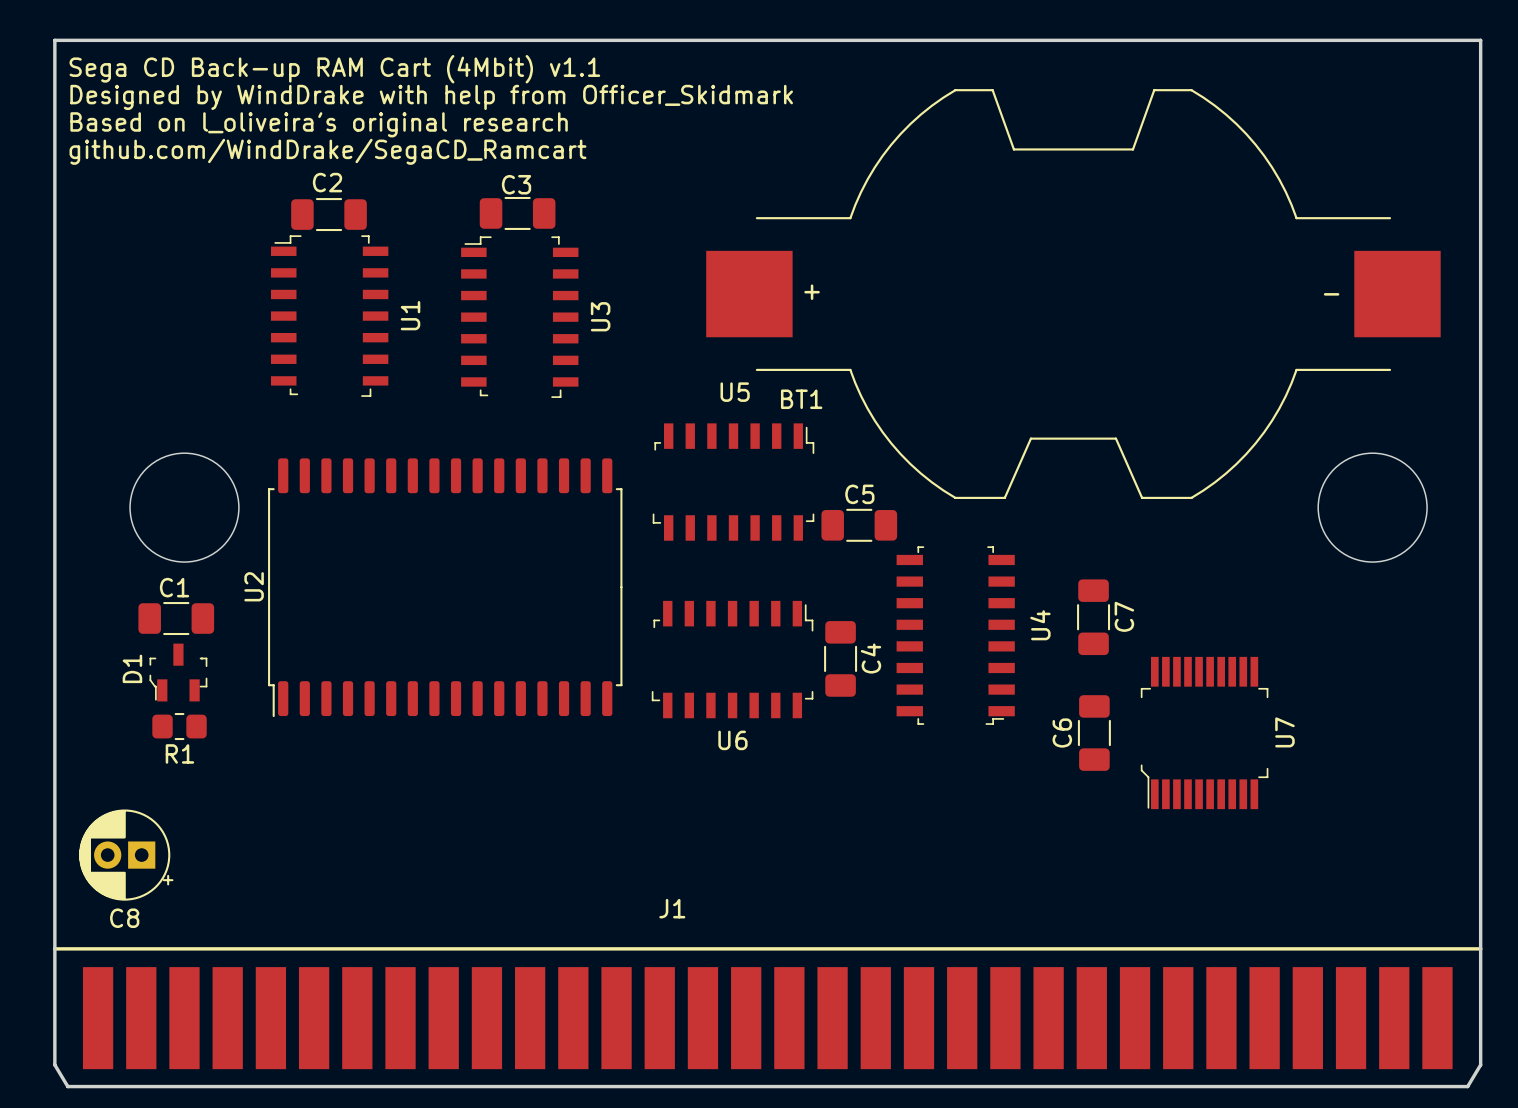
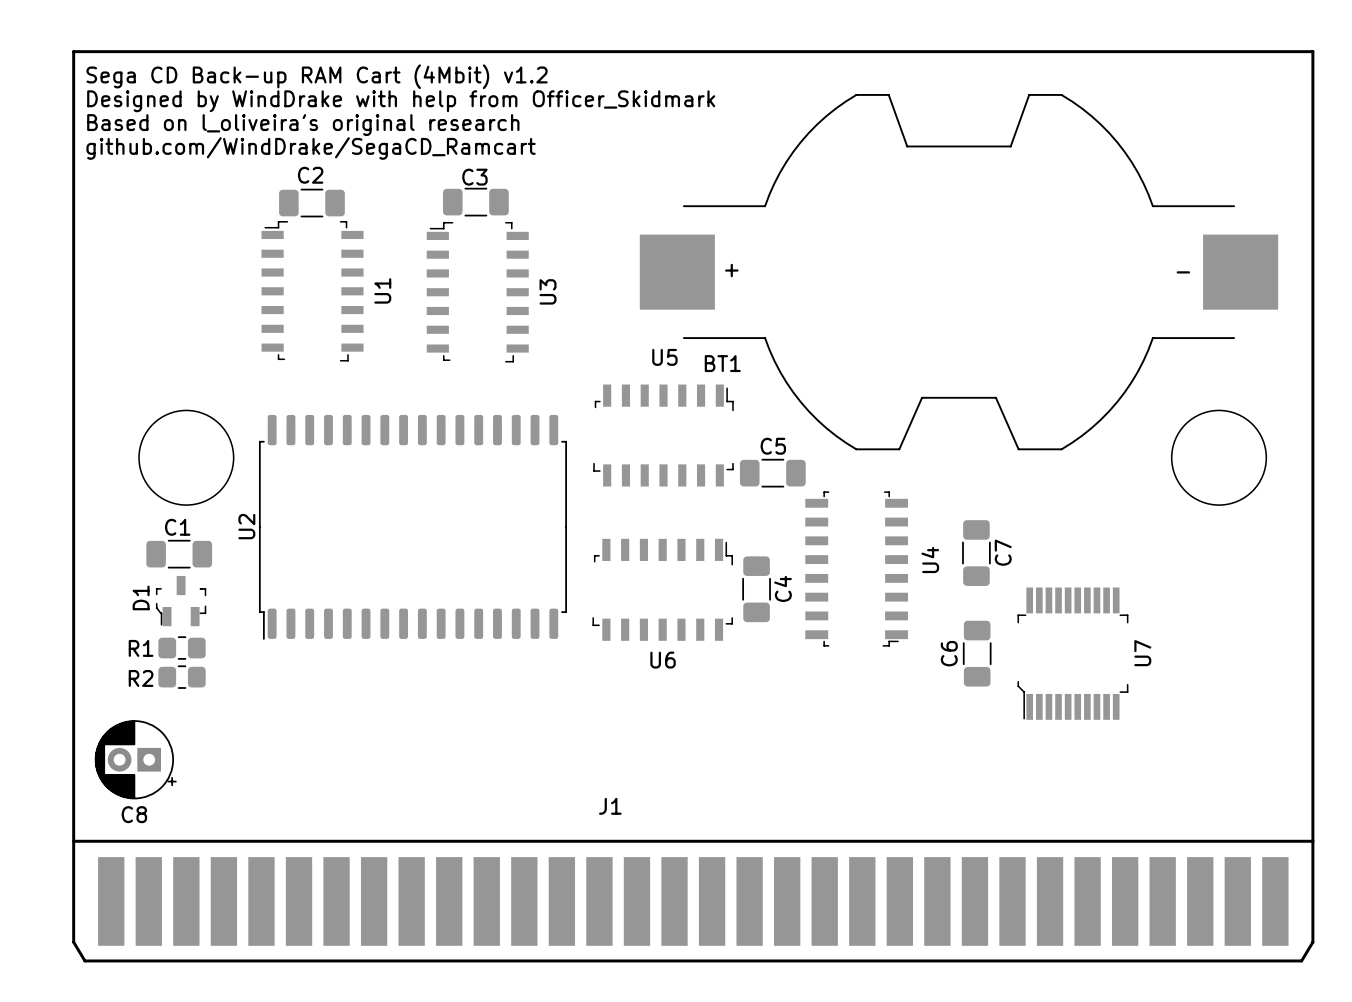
text: Sega CD Back-up RAM Cart (4Mbit) v1.1 (334, 69) -> Sega CD Back-up RAM Cart (4Mbit) v1.2 (317, 76)
R1 name position: R1 (179, 753) -> R1 (141, 648)
R2: none -> (182, 677)

